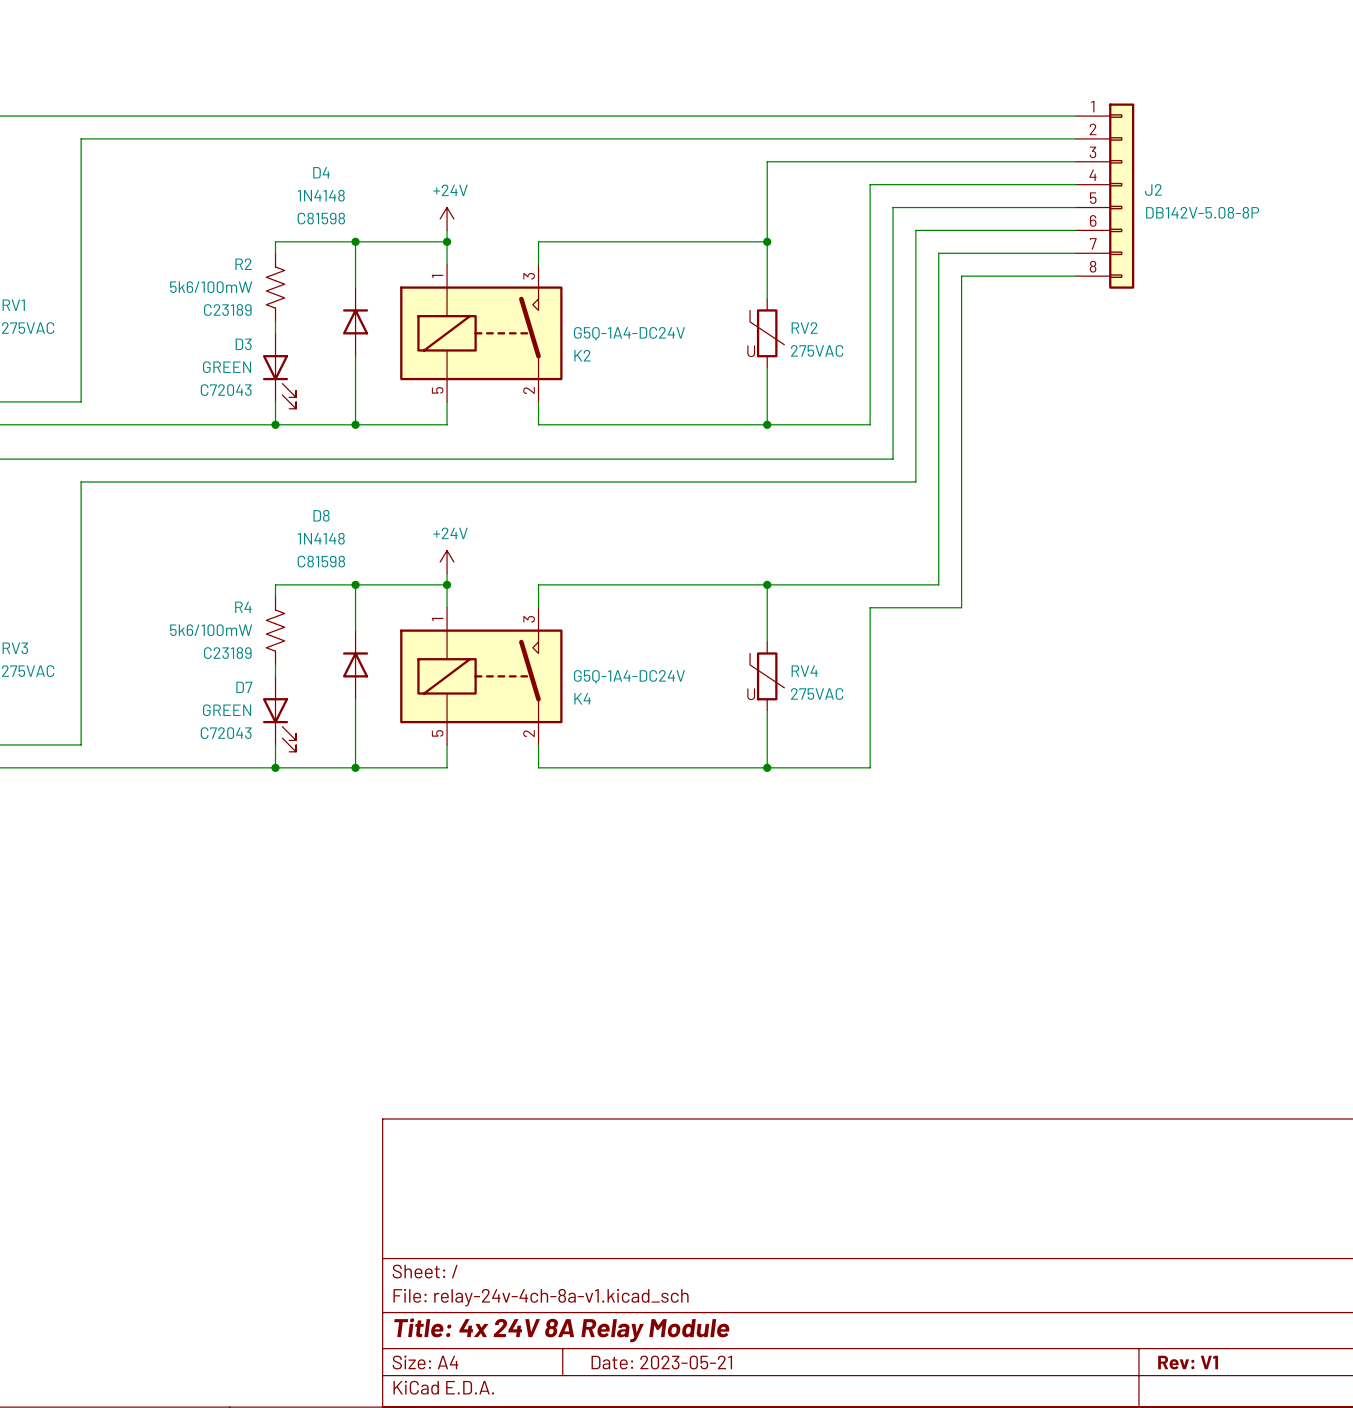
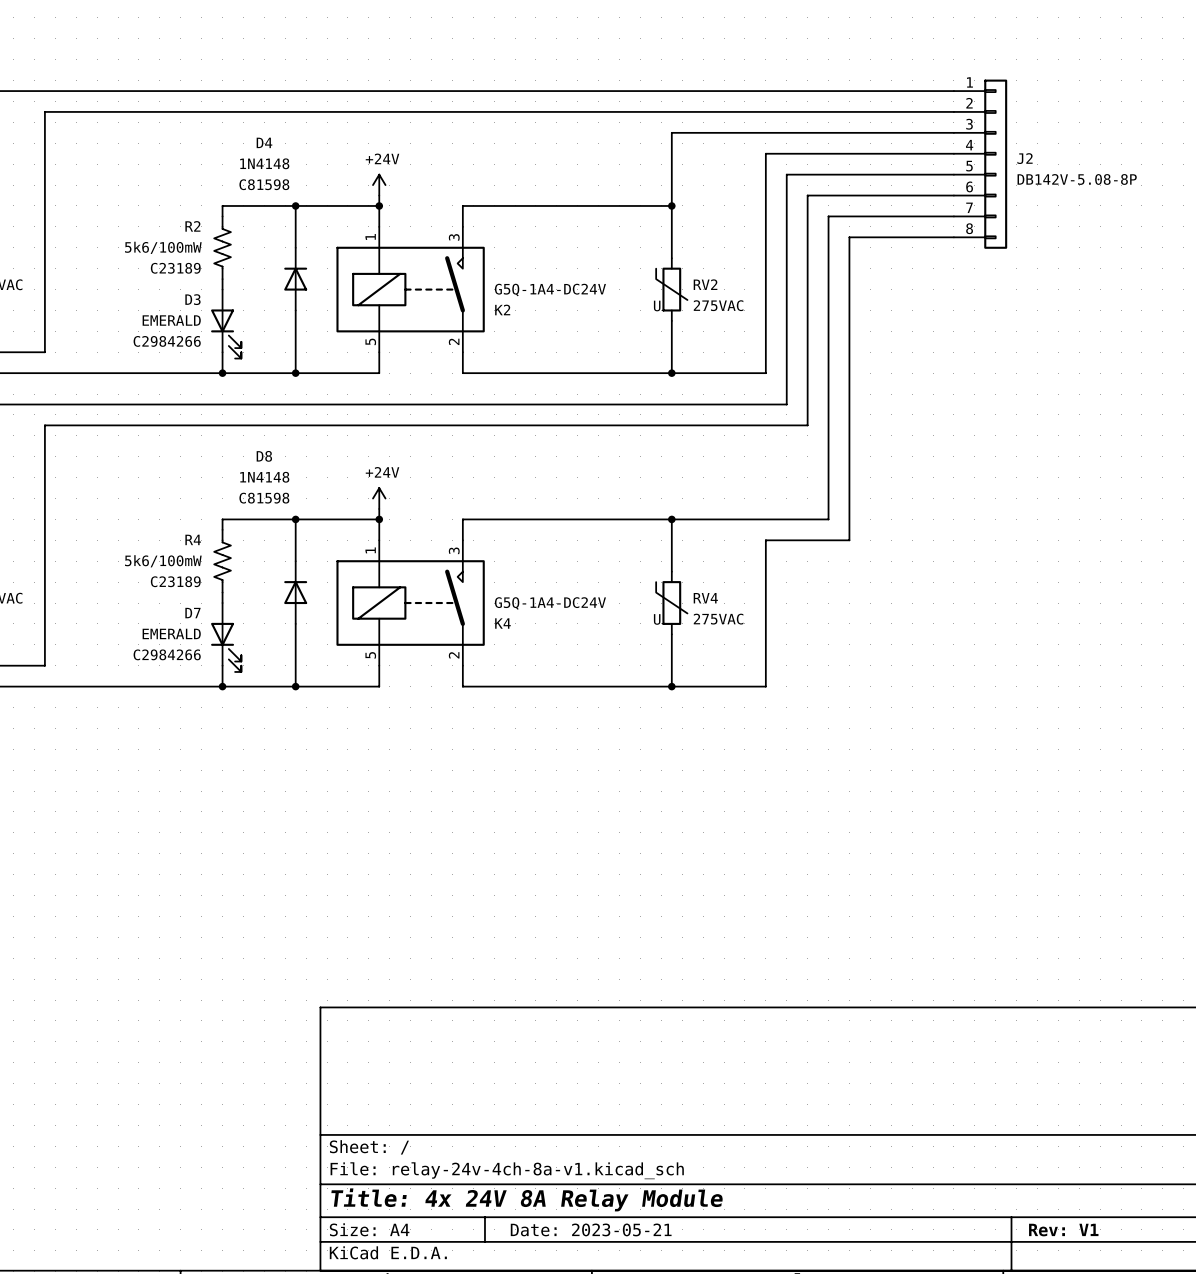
D3 value: GREEN (227, 367) -> EMERALD (171, 320)
D3 text: C72043 (226, 390) -> C2984266 (167, 341)
D7 value: GREEN (227, 710) -> EMERALD (171, 633)
D7 text: C72043 (226, 733) -> C2984266 (167, 654)

